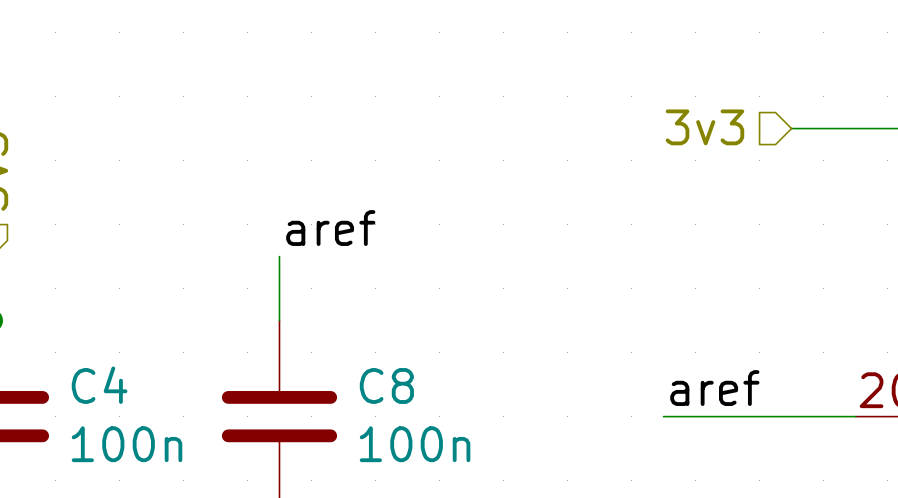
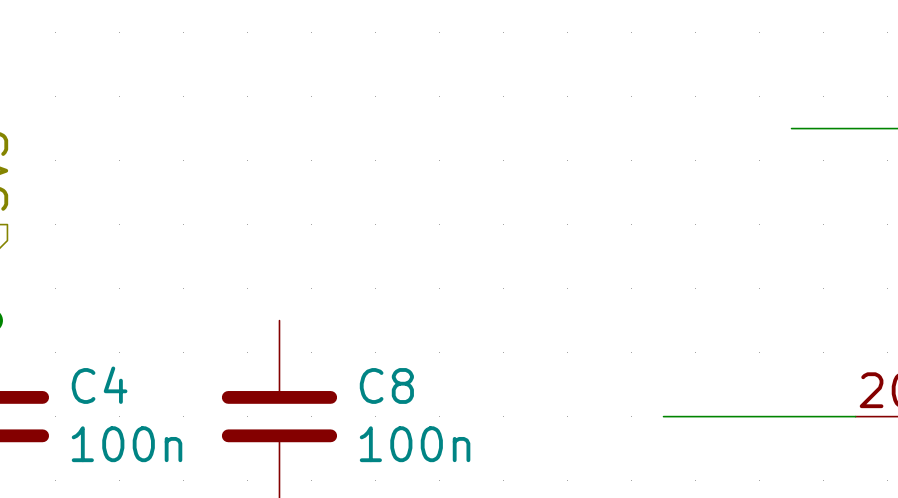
hierarchical label: 3v3 (704, 127) -> none
label: aref (330, 228) -> none
wire: (279, 256) (279, 320) -> none
label: aref (714, 388) -> none

